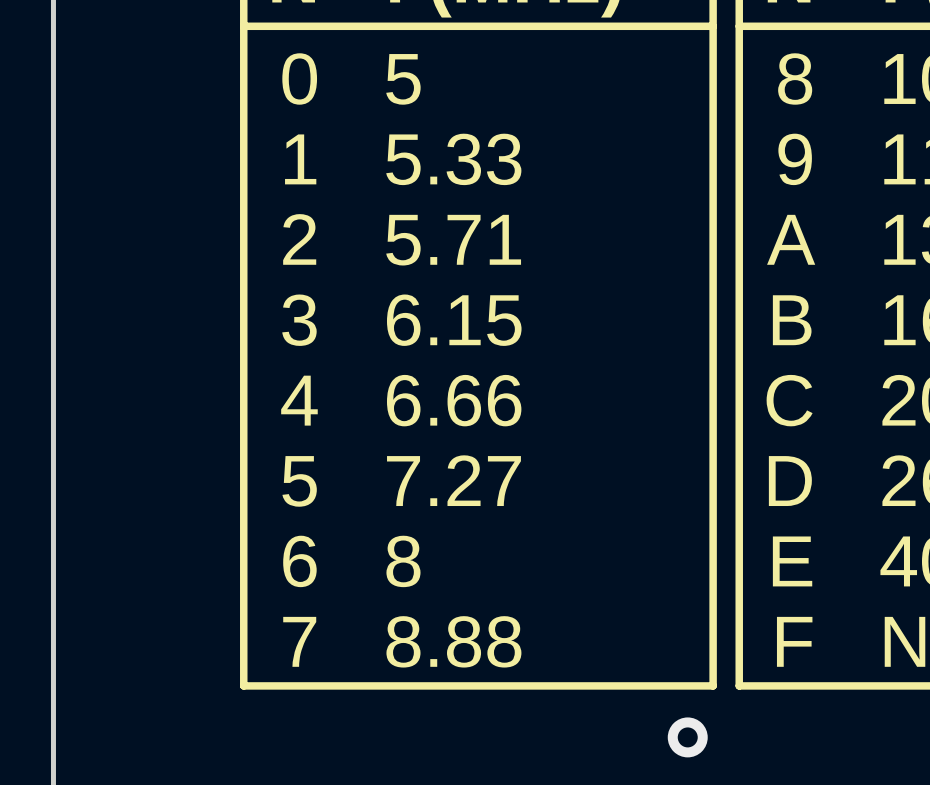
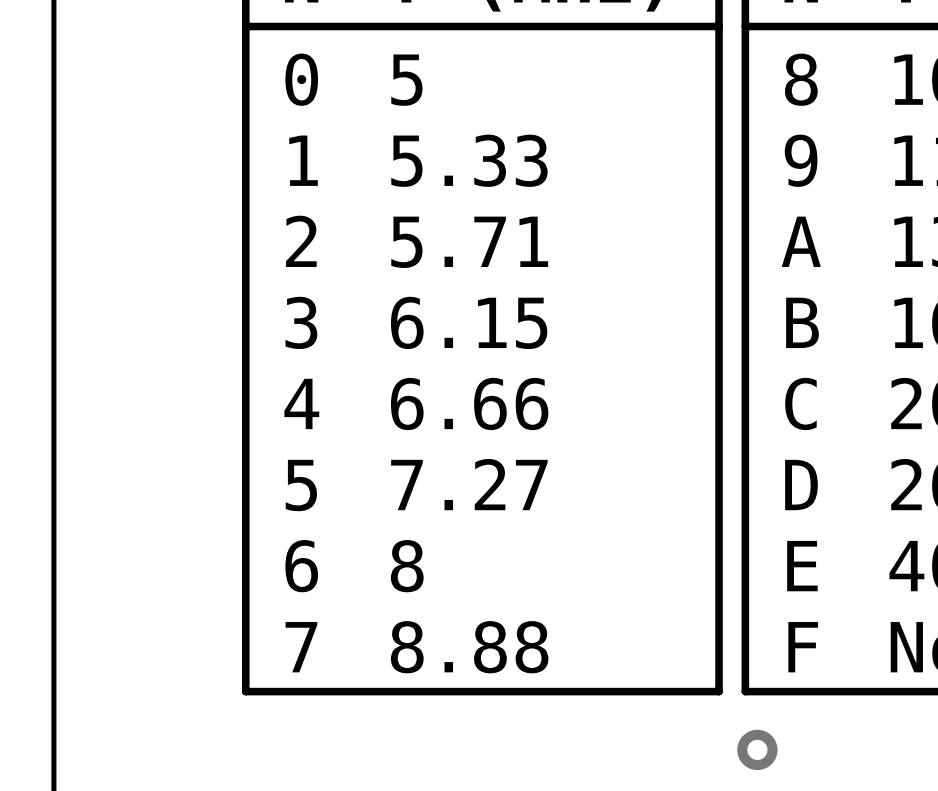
via position: (687, 737) -> (757, 749)

